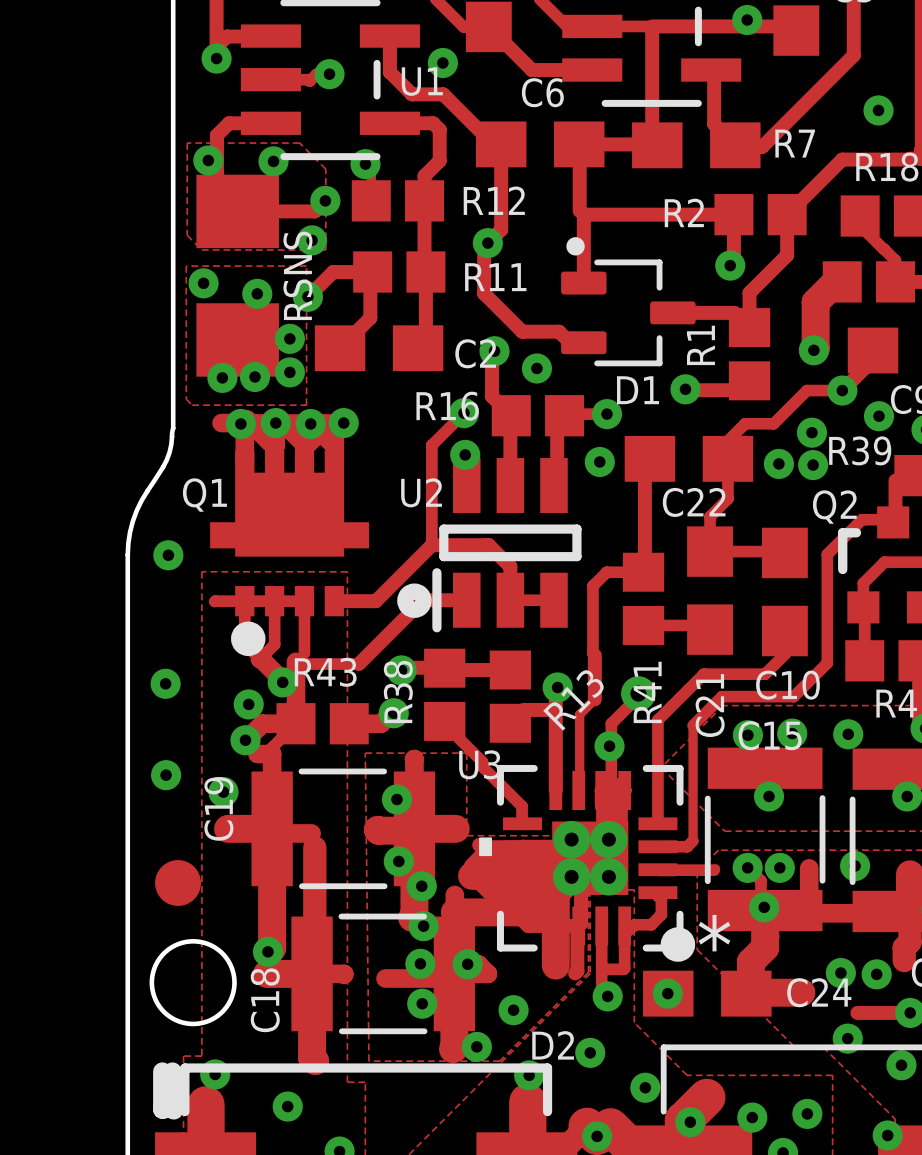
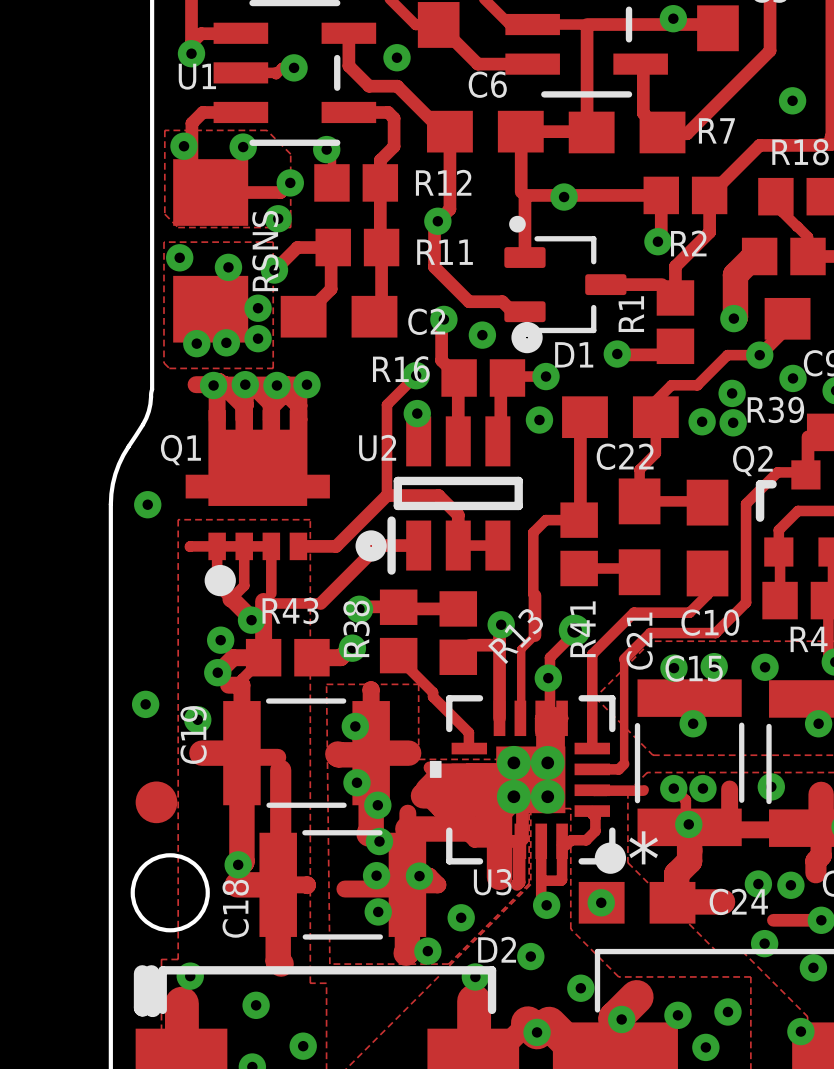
U1 name position: U1 (422, 81) -> U1 (197, 76)
R2 name position: R2 (684, 212) -> R2 (688, 243)
via: none -> (564, 197)
drawing: none -> [511, 321, 543, 354]
via: (165, 683) -> none
U3 name position: U3 (479, 764) -> U3 (492, 882)

